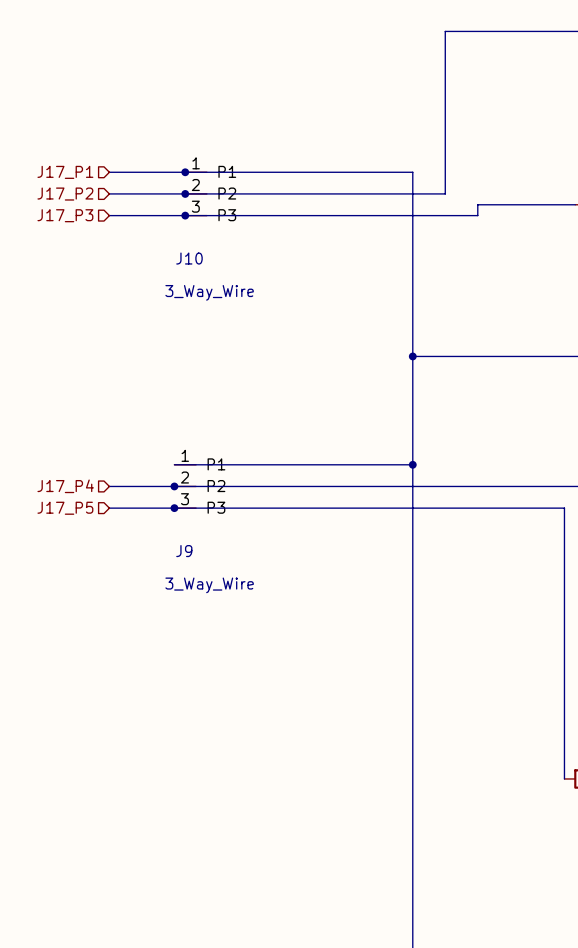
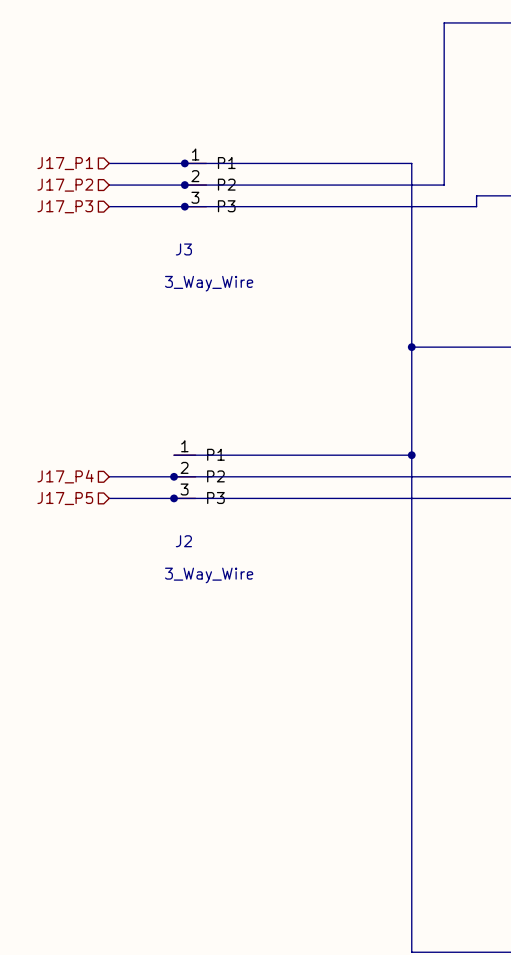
J10 name: J10 (189, 258) -> J3 (183, 249)
J9 name: J9 (184, 551) -> J2 (183, 541)

